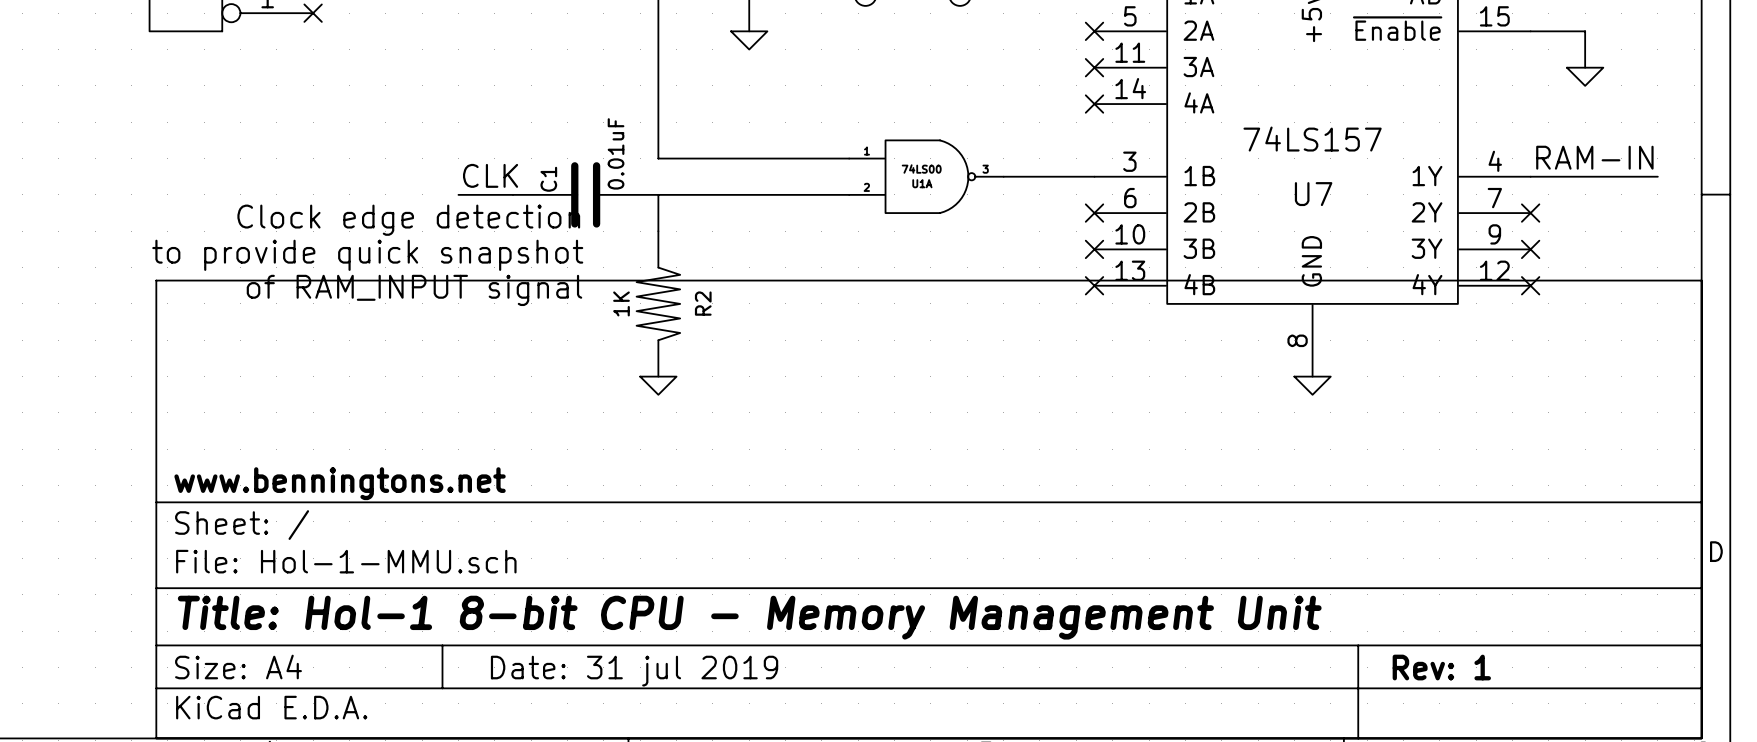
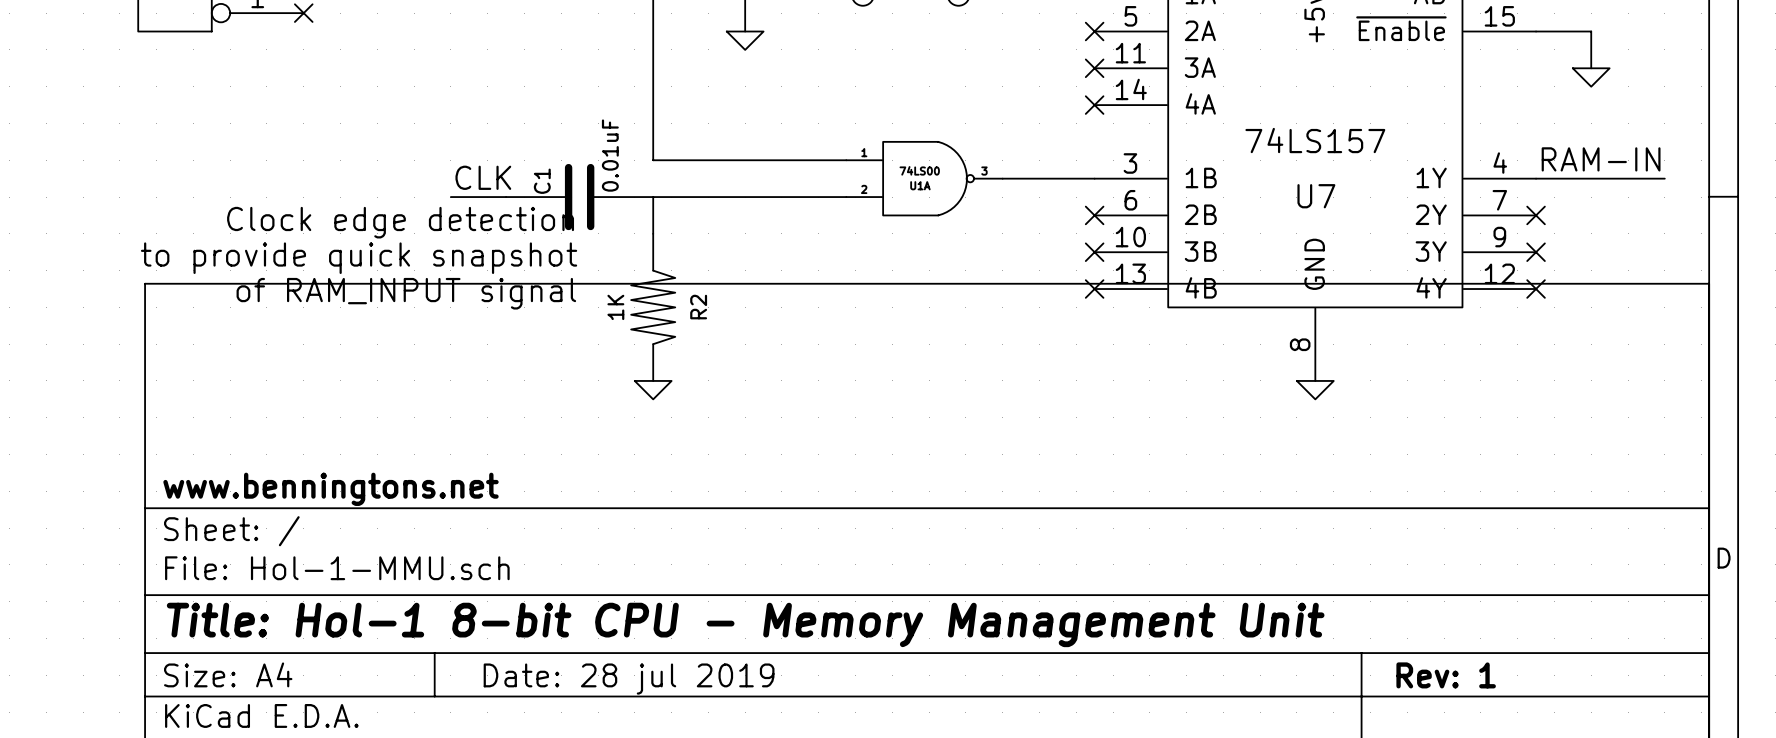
title block: Date: 31 jul 2019 (634, 671) -> Date: 28 jul 2019 (629, 679)

